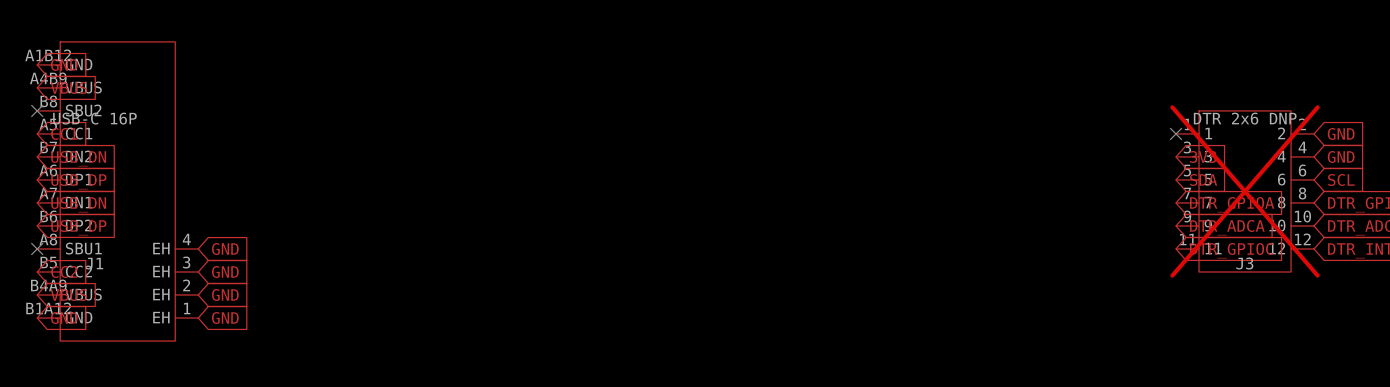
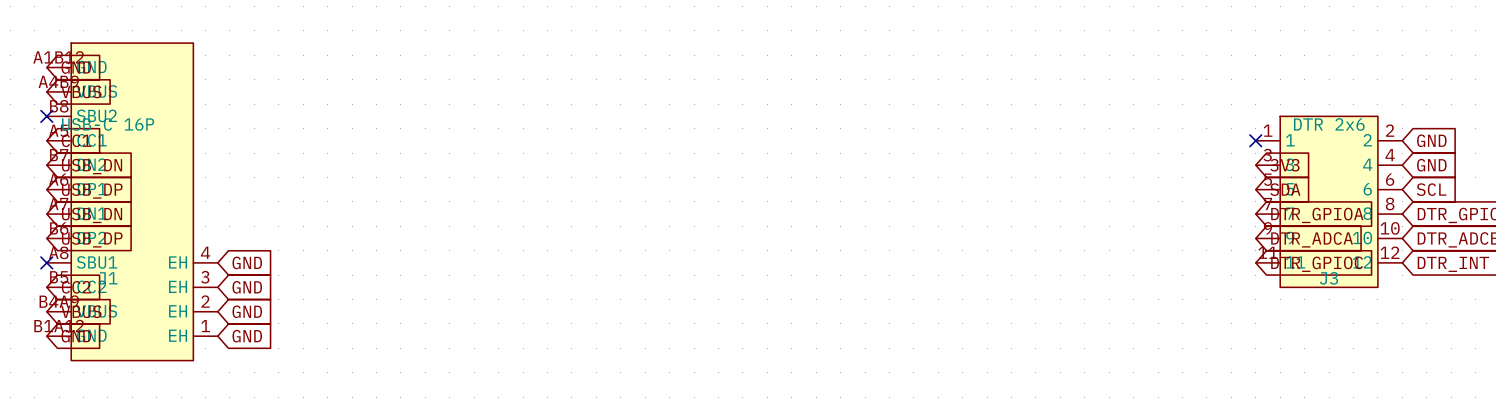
J3 value: DTR 2x6 DNP (1245, 118) -> DTR 2x6 (1329, 124)
J3 do-not-place cross: (1245, 191) -> none

